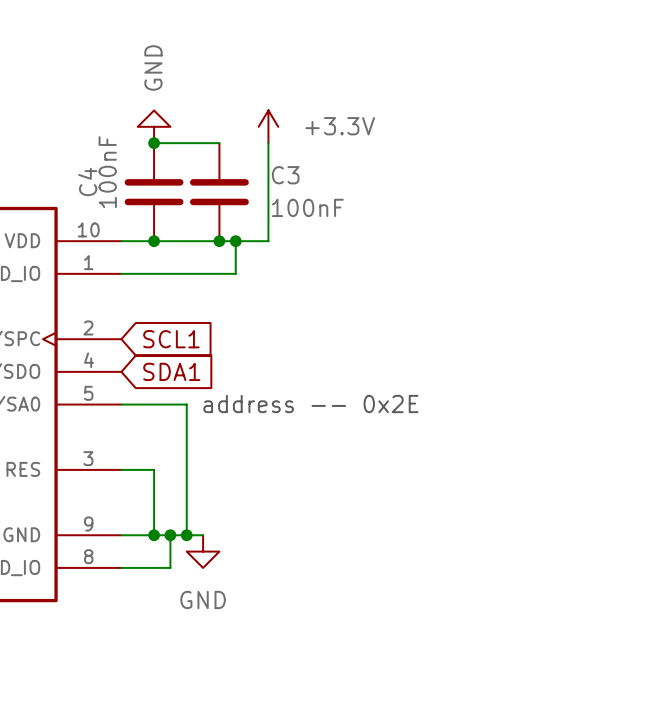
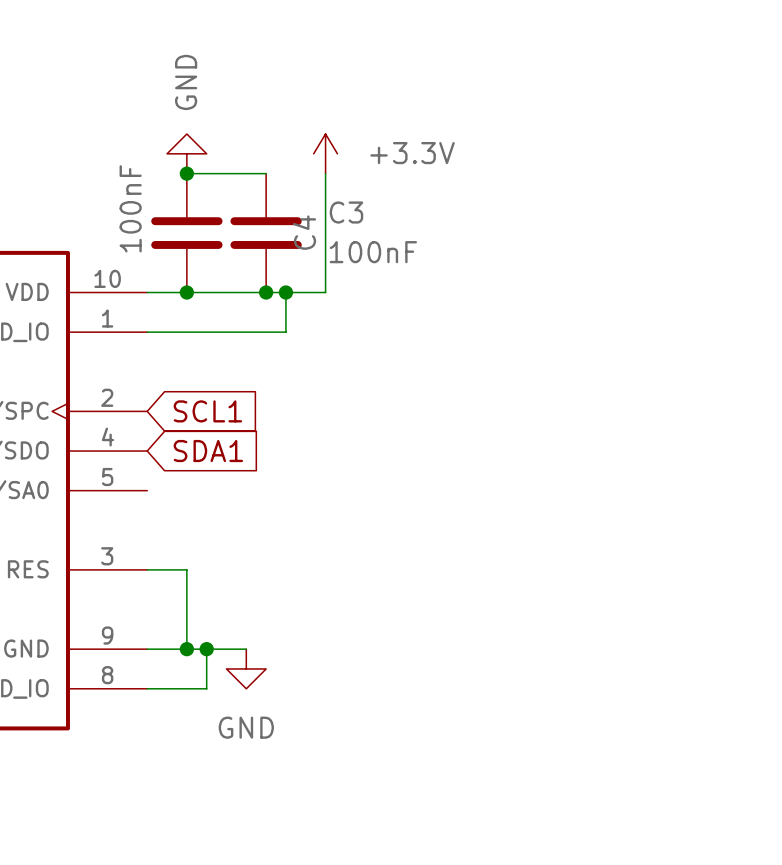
C4 name position: C4 (87, 181) -> C4 (304, 232)
text: address -- 0x2E (310, 403) -> none
wire: (121, 404) (186, 404) (186, 535) -> none
junction: (186, 535) -> none

